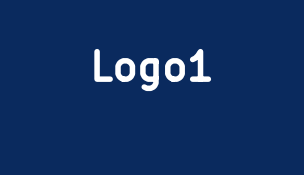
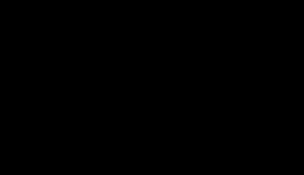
Logo1: (152, 69) -> none

